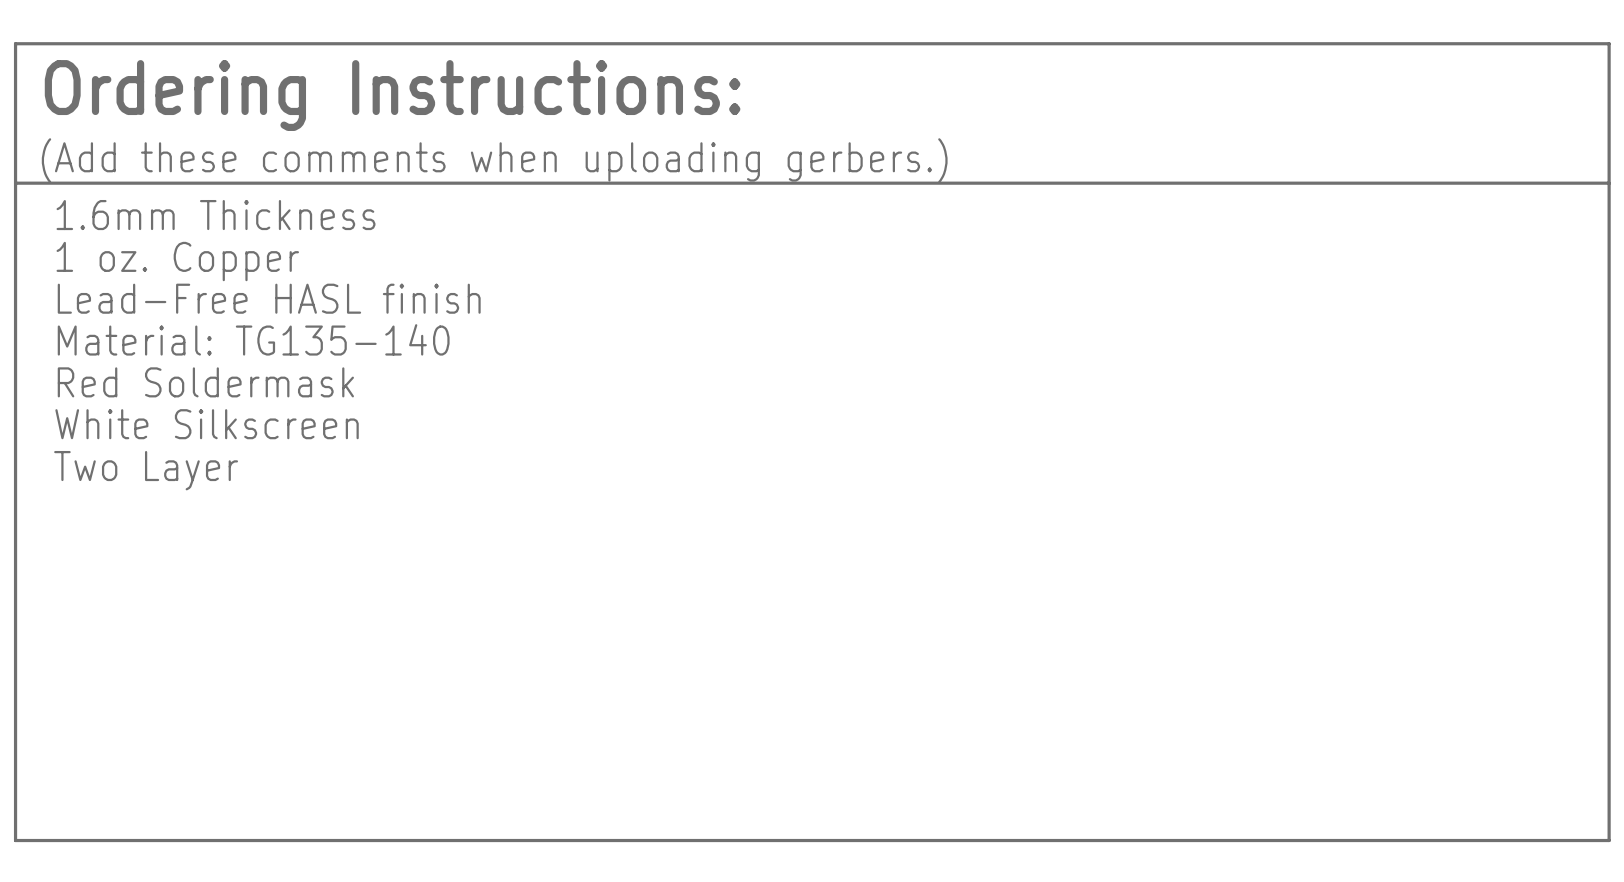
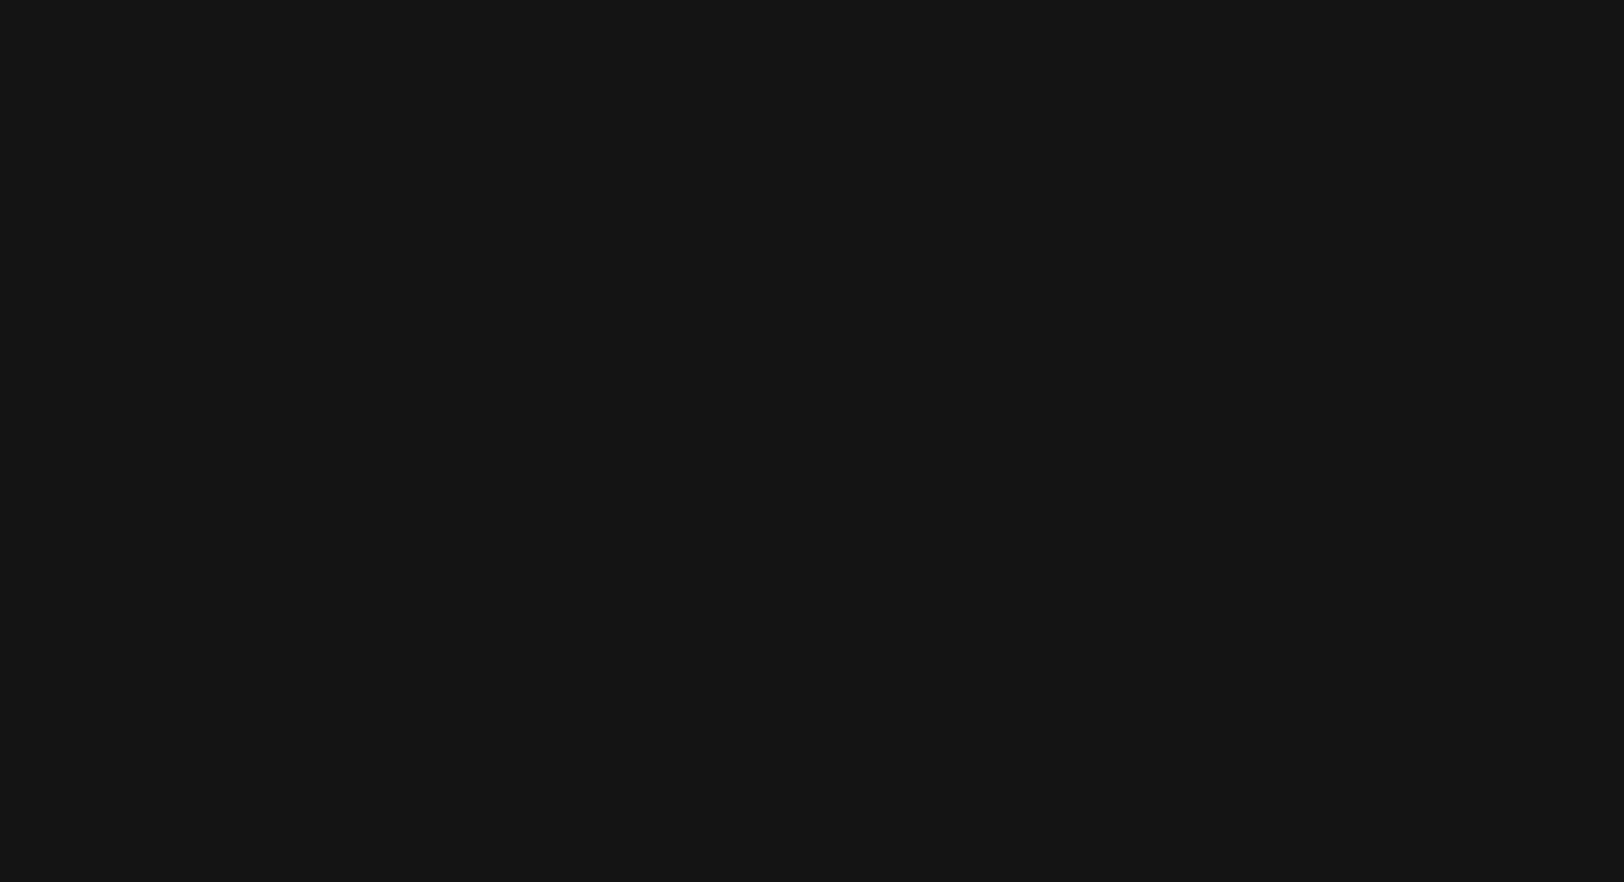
drawing: [13, 42, 1611, 843] -> none
text: 1.6mm Thickness (216, 215) -> none
text: 1 oz. Copper (177, 261) -> none
text: Lead-Free HASL finish (269, 298) -> none
text: Material: TG135-140 (253, 339) -> none
text: Red Soldermask (205, 382) -> none
text: White Silkscreen (207, 424) -> none
text: Two Layer (146, 470) -> none

